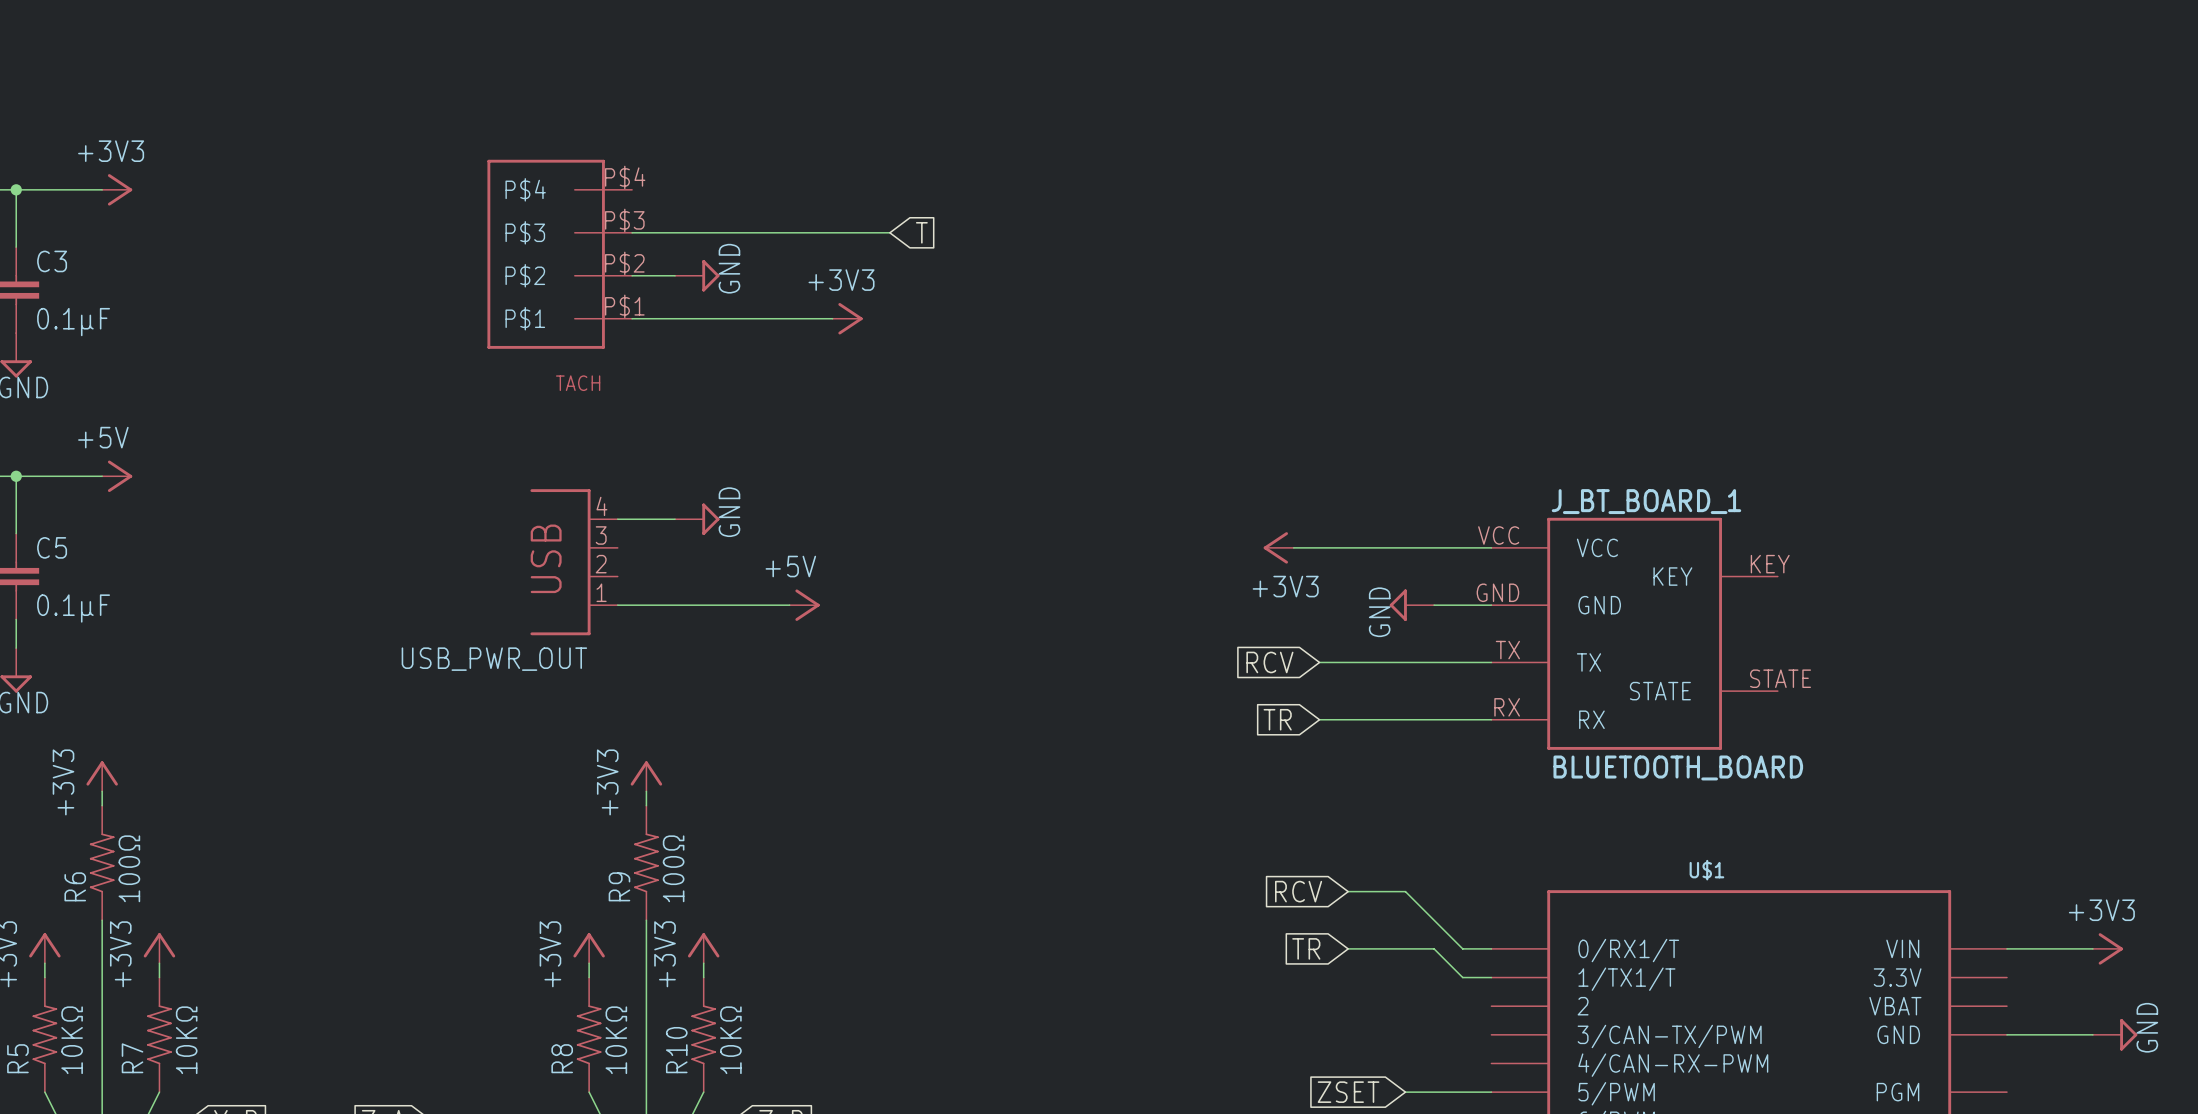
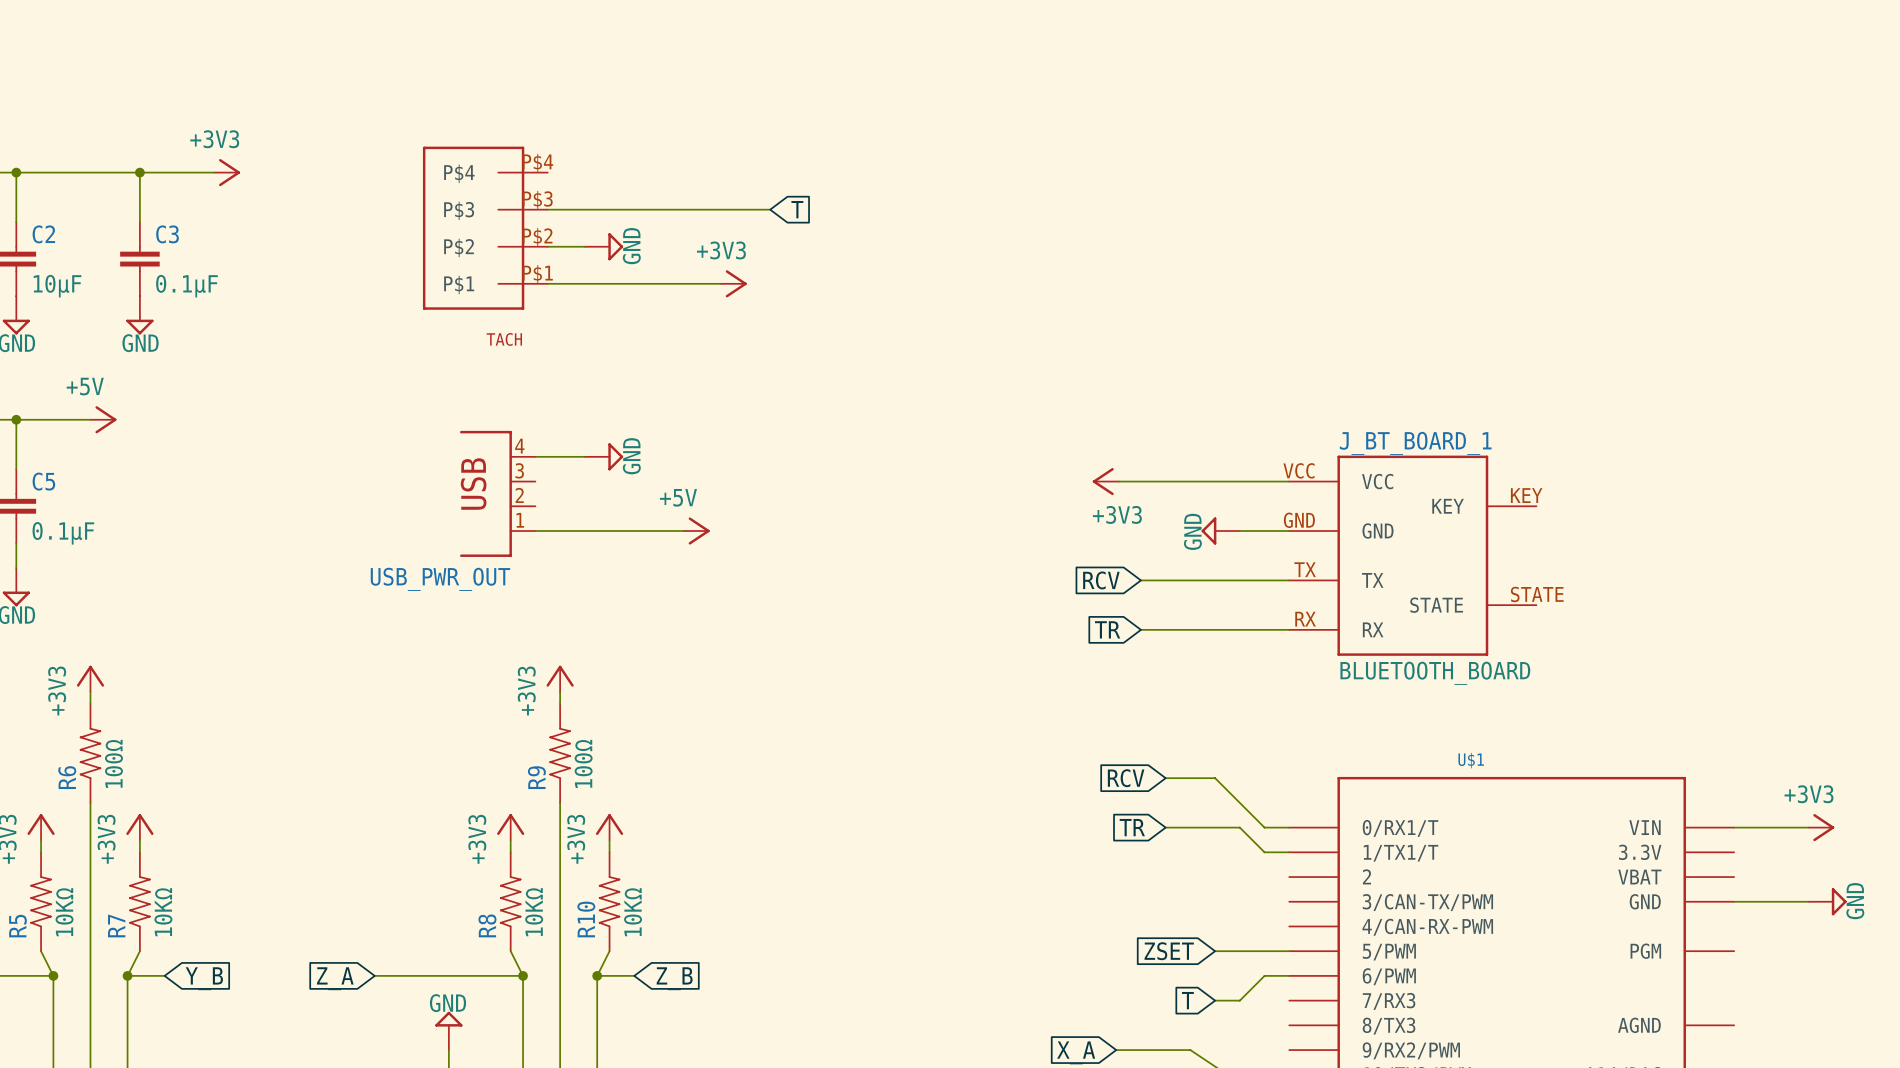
wire: none -> (90, 172) (214, 172)
power symbol position: +3V3 (117, 189) -> +3V3 (227, 172)
wire: none -> (139, 172) (139, 222)
junction: none -> (139, 172)
C3 name: C3 (52, 261) -> C2 (43, 234)
C3: none -> 0.1µF (139, 259)
C3 value: 0.1µF (73, 322) -> 10µF (57, 286)
power symbol: none -> GND (139, 315)

